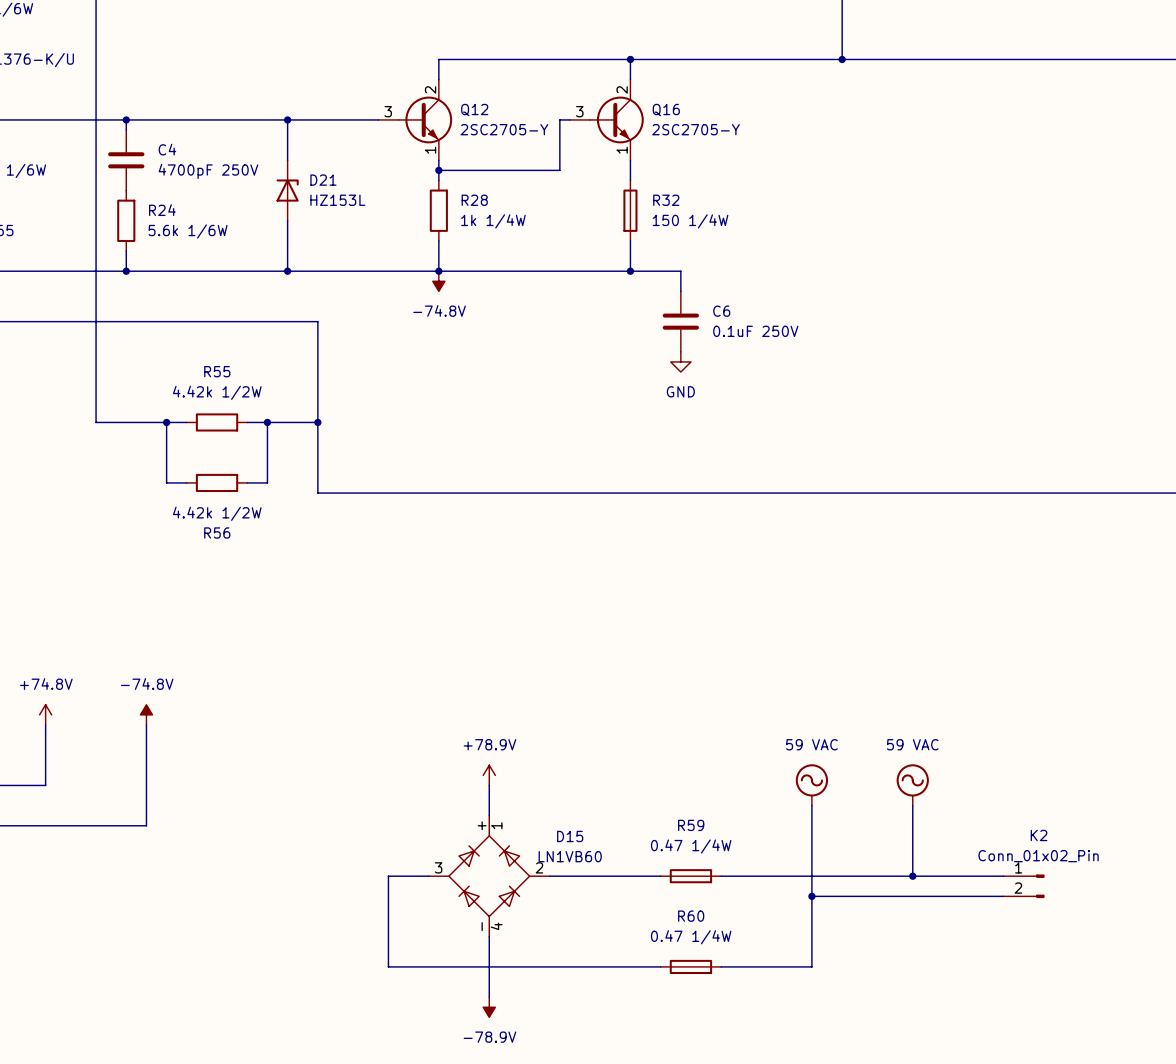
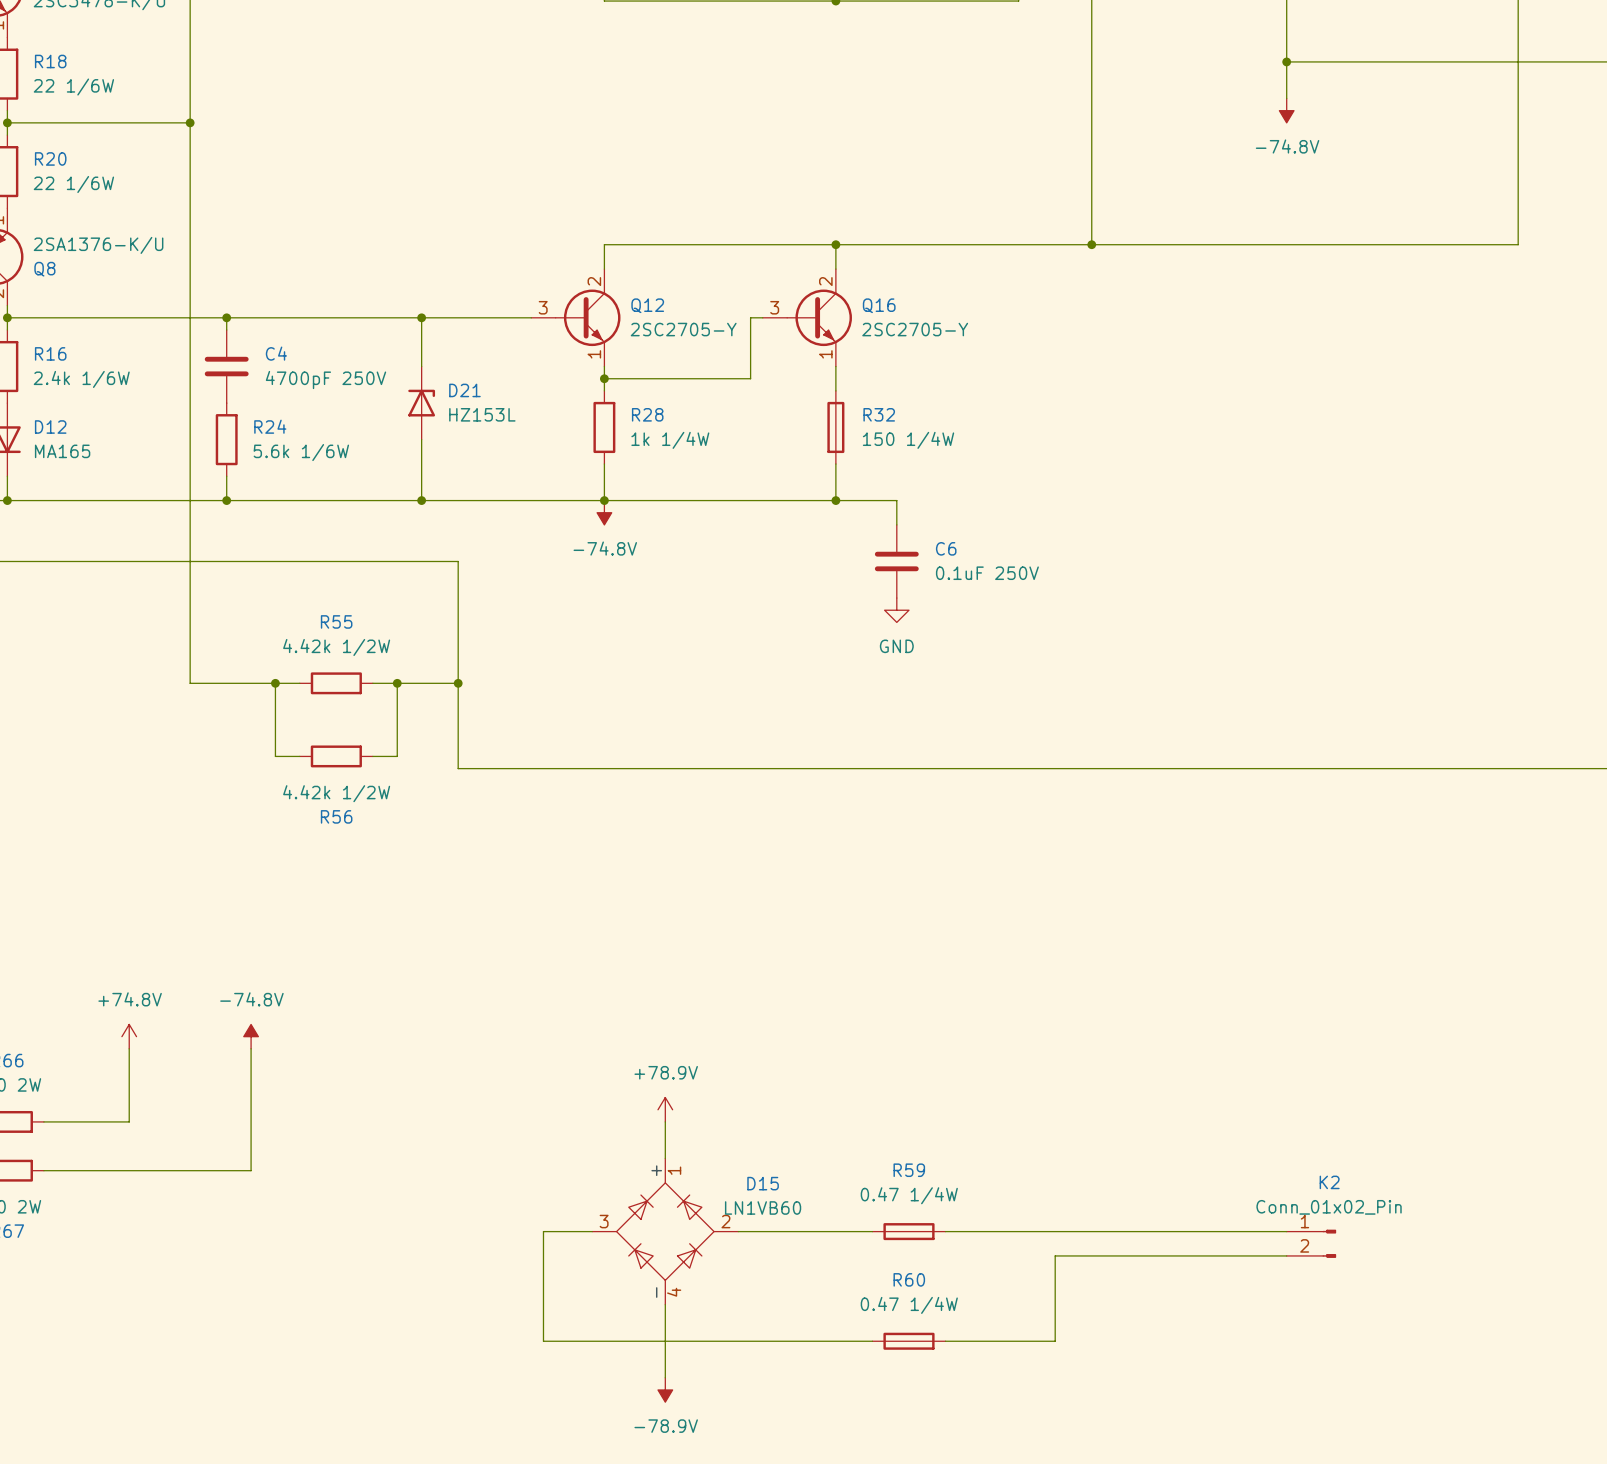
power symbol: 59 VAC (811, 784) -> none
power symbol: 59 VAC (912, 784) -> none
wire: (811, 805) (811, 896) -> none
wire: (912, 805) (912, 876) -> none
junction: (912, 876) -> none
junction: (811, 896) -> none

